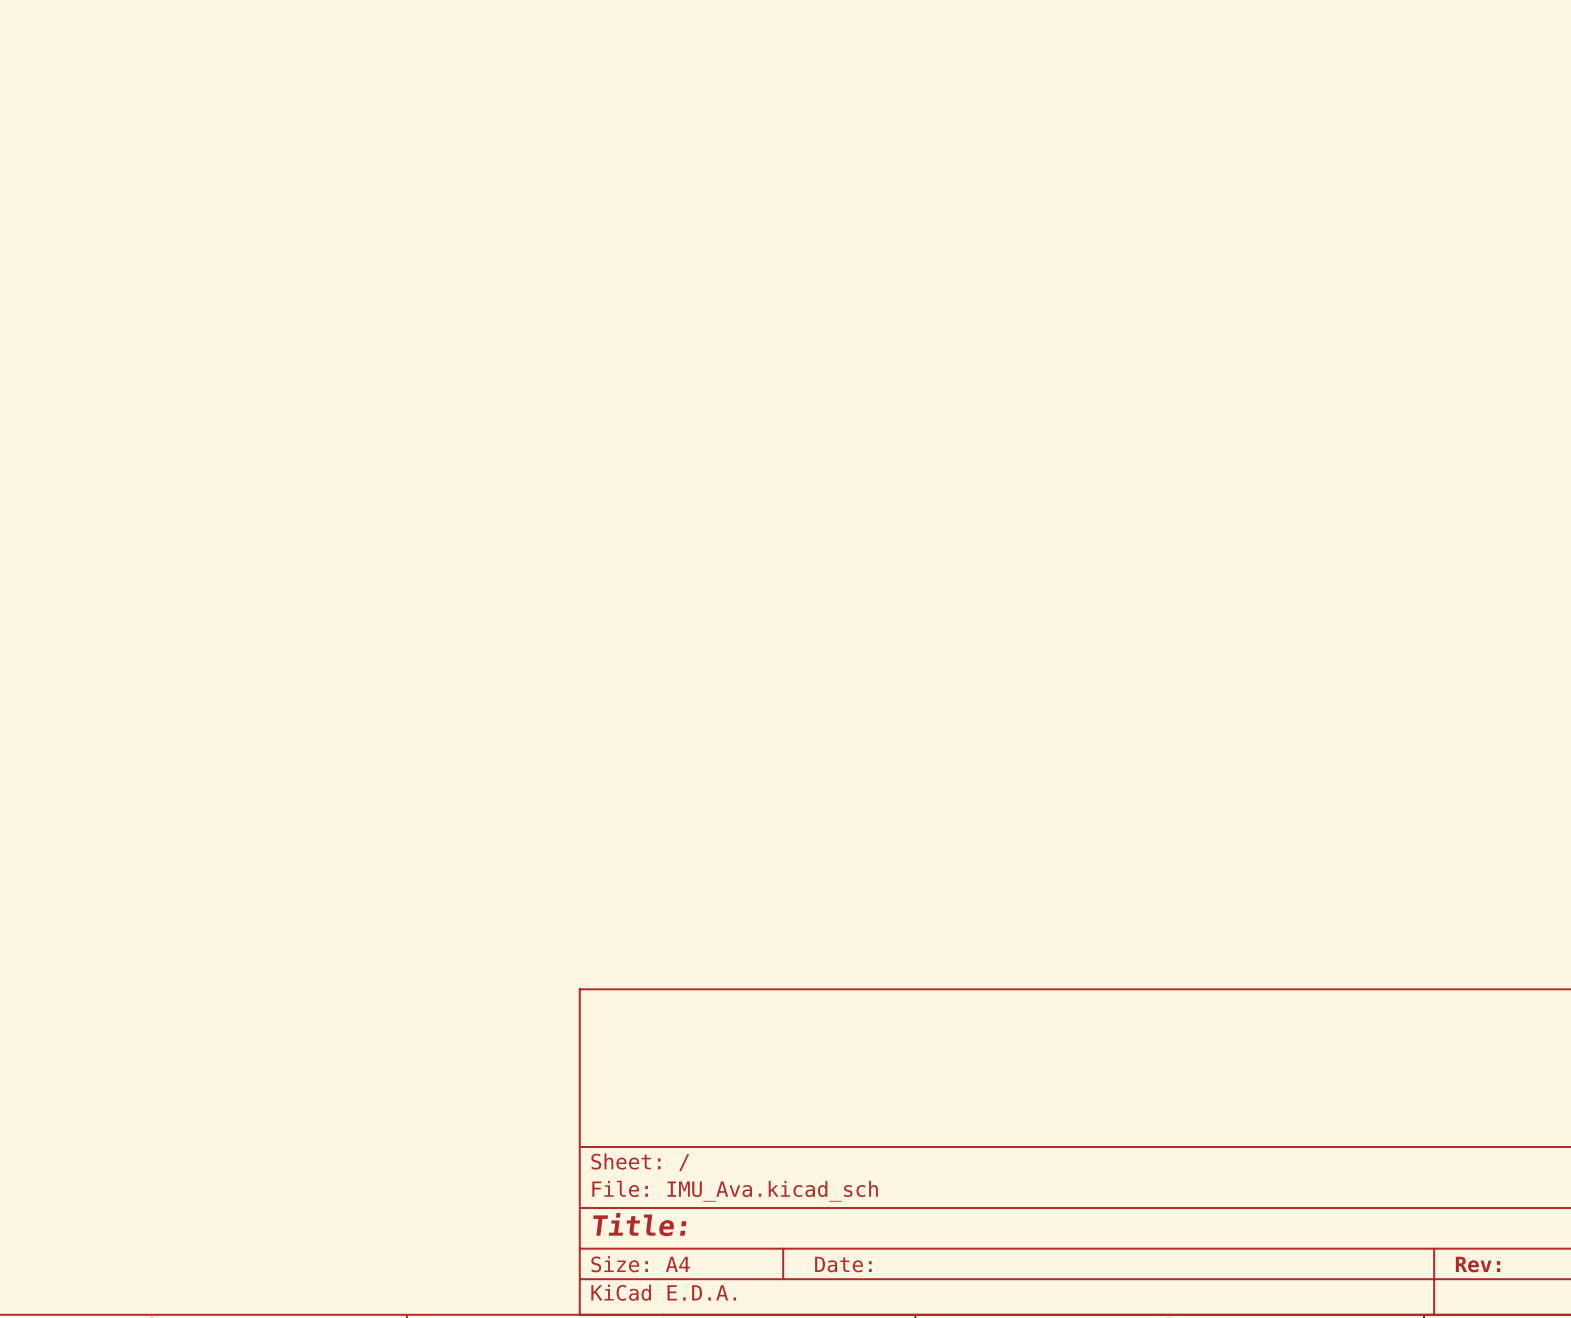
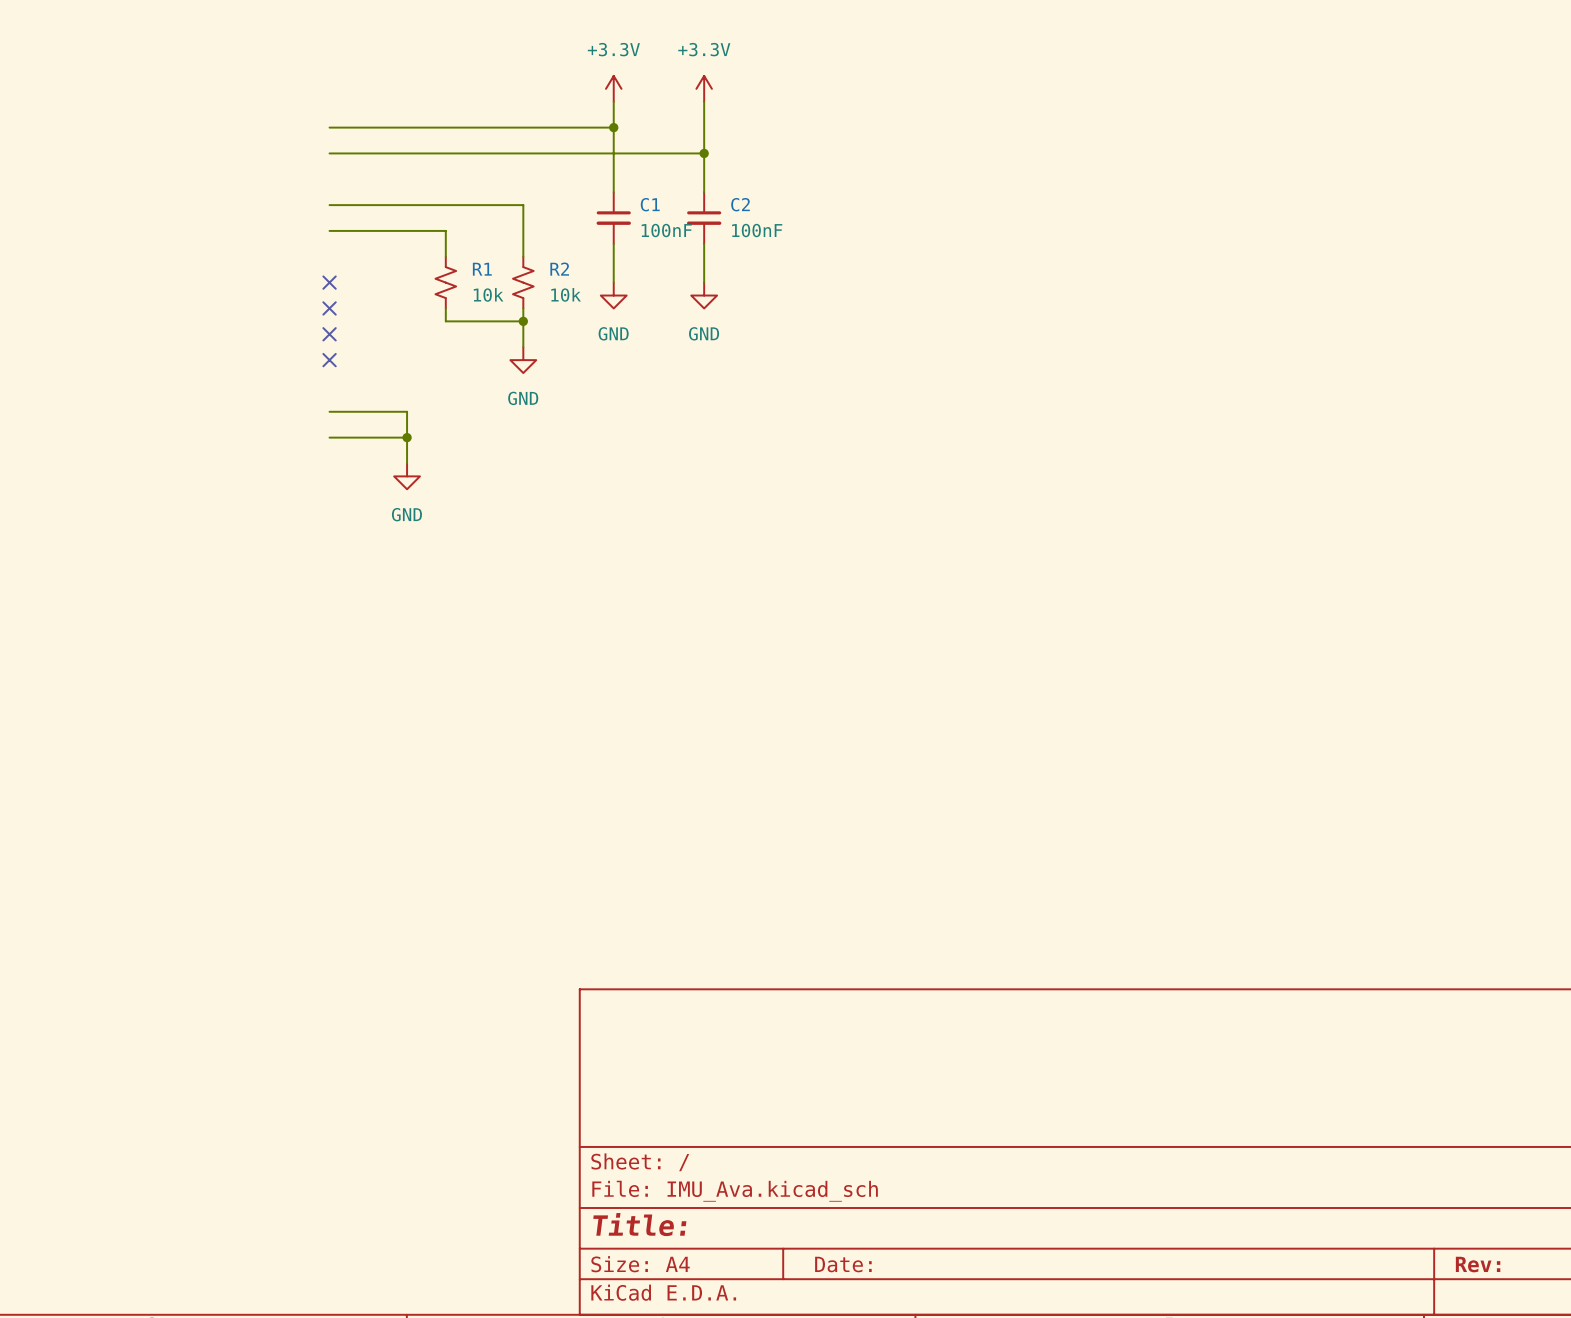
power symbol: none -> +3.3V (613, 88)
power symbol: none -> +3.3V (704, 88)
wire: none -> (613, 101) (613, 192)
wire: none -> (704, 101) (704, 192)
wire: none -> (329, 127) (613, 127)
junction: none -> (613, 127)
wire: none -> (329, 153) (704, 153)
junction: none -> (704, 153)
wire: none -> (329, 205) (523, 205) (523, 256)
C1: none -> 100nF (613, 218)
C2: none -> 100nF (704, 218)
wire: none -> (329, 230) (445, 230) (445, 256)
wire: none -> (613, 243) (613, 282)
wire: none -> (704, 243) (704, 282)
no-connect mark: none -> (329, 282)
R1: none -> 10k (445, 282)
R2: none -> 10k (523, 282)
power symbol: none -> GND (613, 295)
power symbol: none -> GND (704, 295)
no-connect mark: none -> (329, 308)
wire: none -> (445, 308) (445, 321) (523, 321)
wire: none -> (523, 308) (523, 347)
junction: none -> (523, 321)
no-connect mark: none -> (329, 334)
no-connect mark: none -> (329, 360)
power symbol: none -> GND (523, 360)
wire: none -> (329, 411) (407, 411) (407, 463)
wire: none -> (329, 437) (407, 437)
junction: none -> (407, 437)
power symbol: none -> GND (407, 476)

